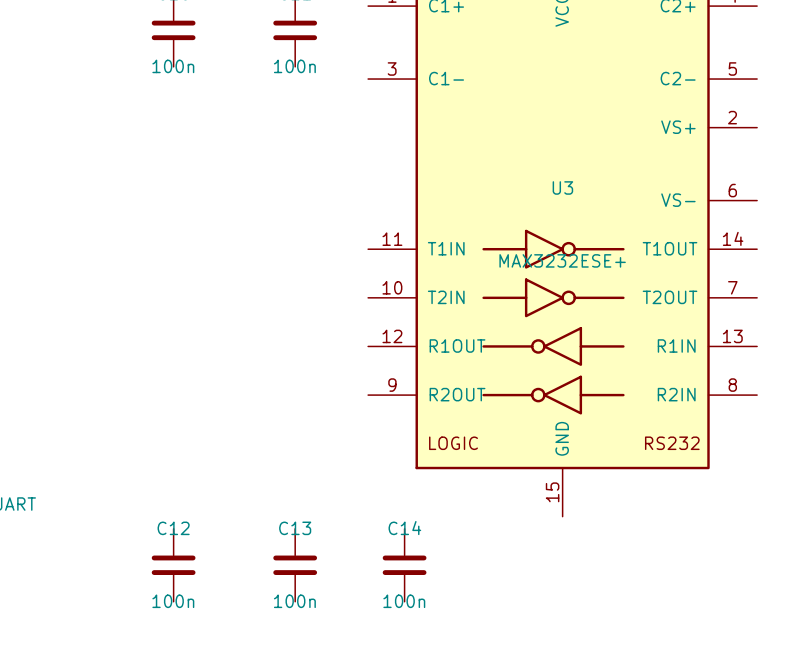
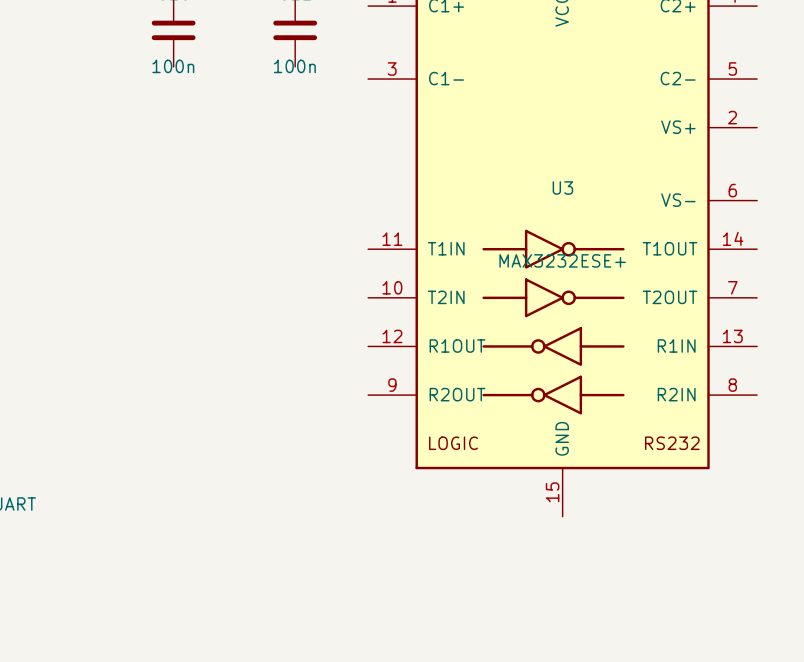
C12: 100n (173, 565) -> none
C13: 100n (295, 565) -> none
C14: 100n (404, 565) -> none

